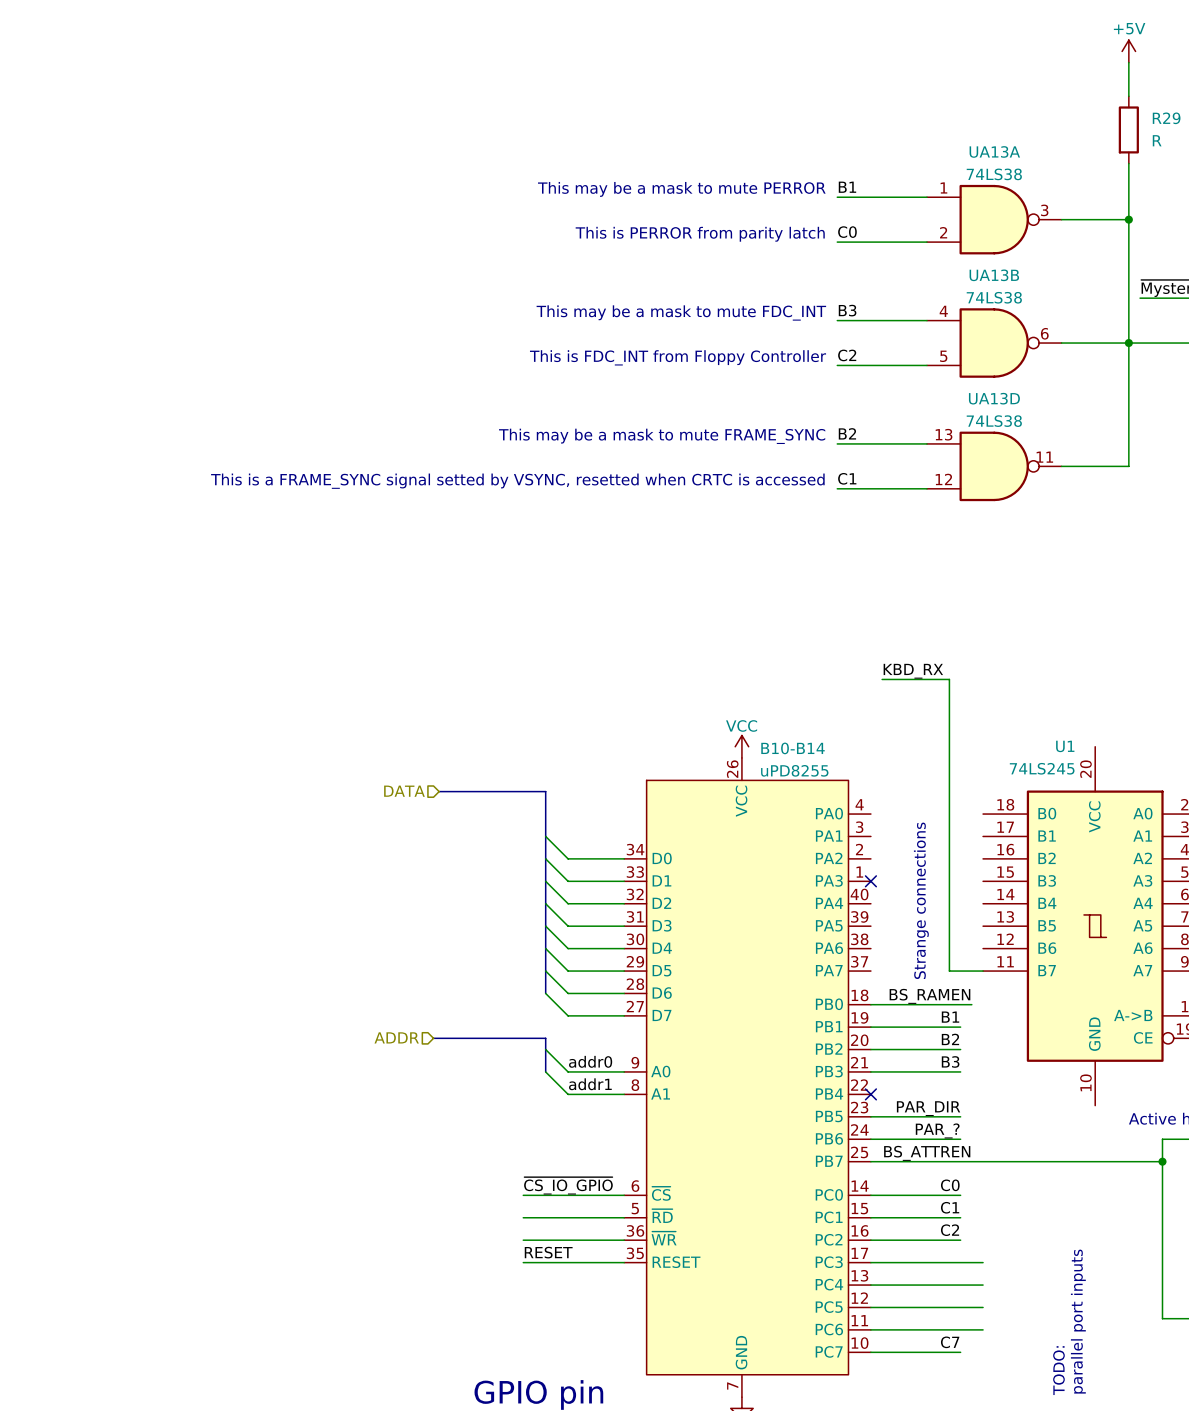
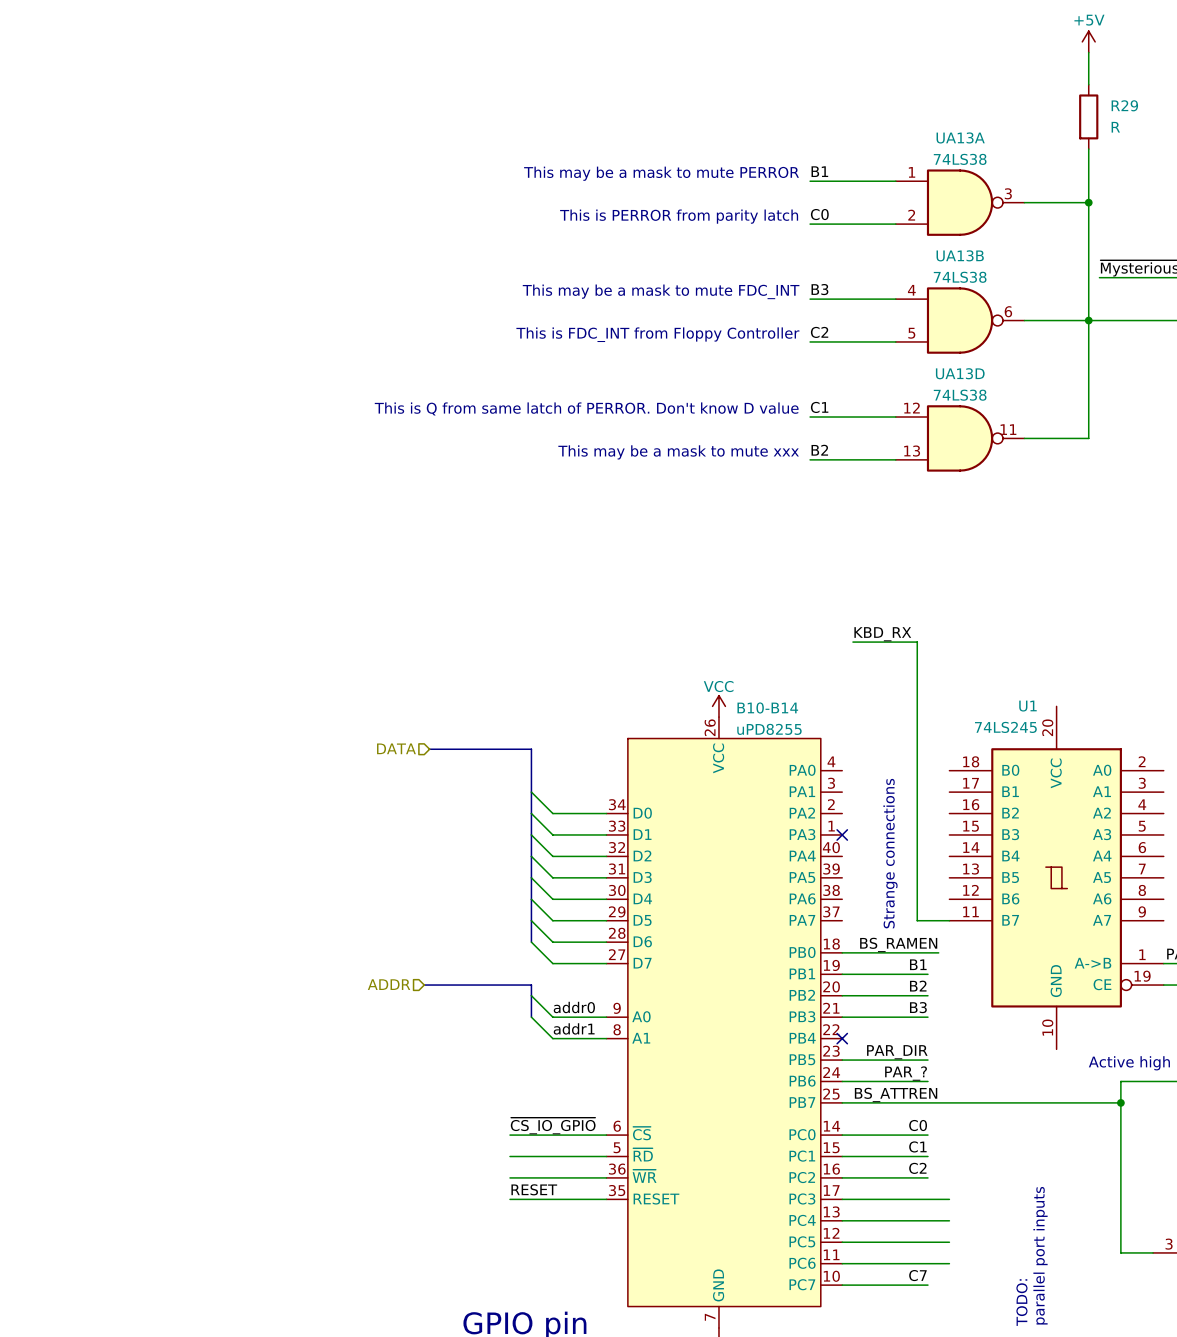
label: B2 (847, 433) -> C1 (819, 407)
text: This may be a mask to mute FRAME_SYNC (662, 436) -> This is Q from same latch of PERROR. Don't know D value (586, 408)
UA13D flip: as is (994, 466) -> up-down (960, 438)
label: C1 (847, 478) -> B2 (819, 450)
text: This is a FRAME_SYNC signal setted by VSYNC, resetted when CRTC is accessed (517, 481) -> This may be a mask to mute xxx (678, 452)

